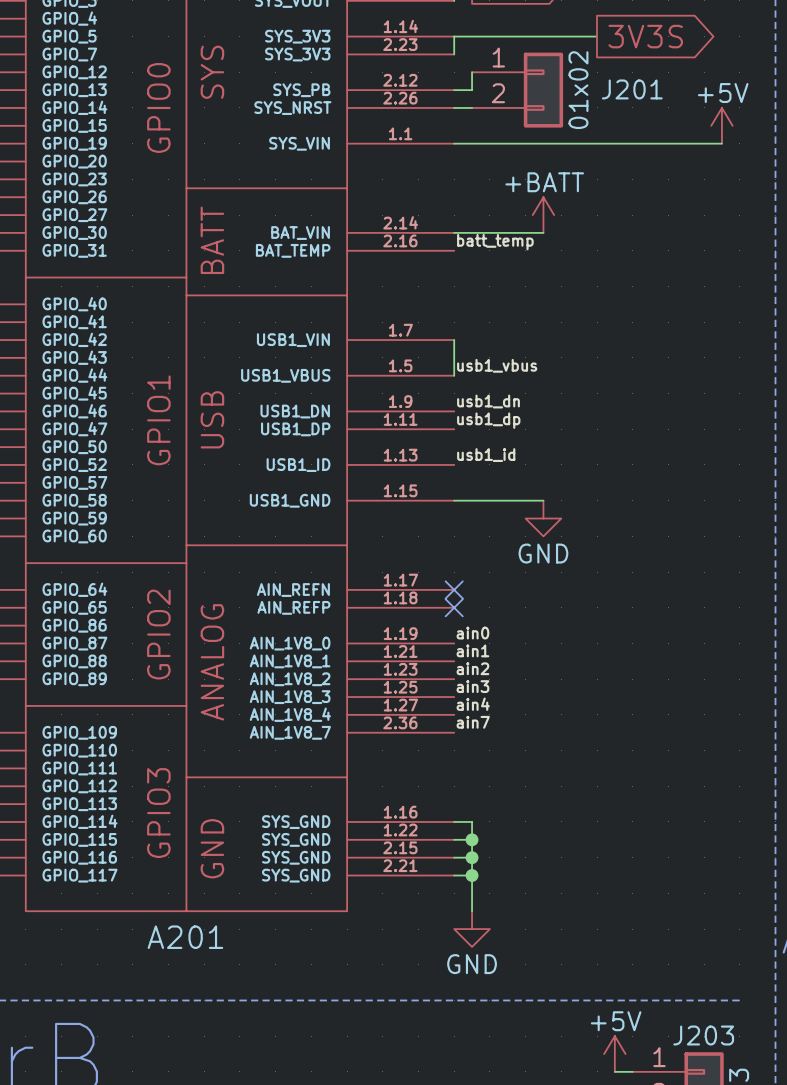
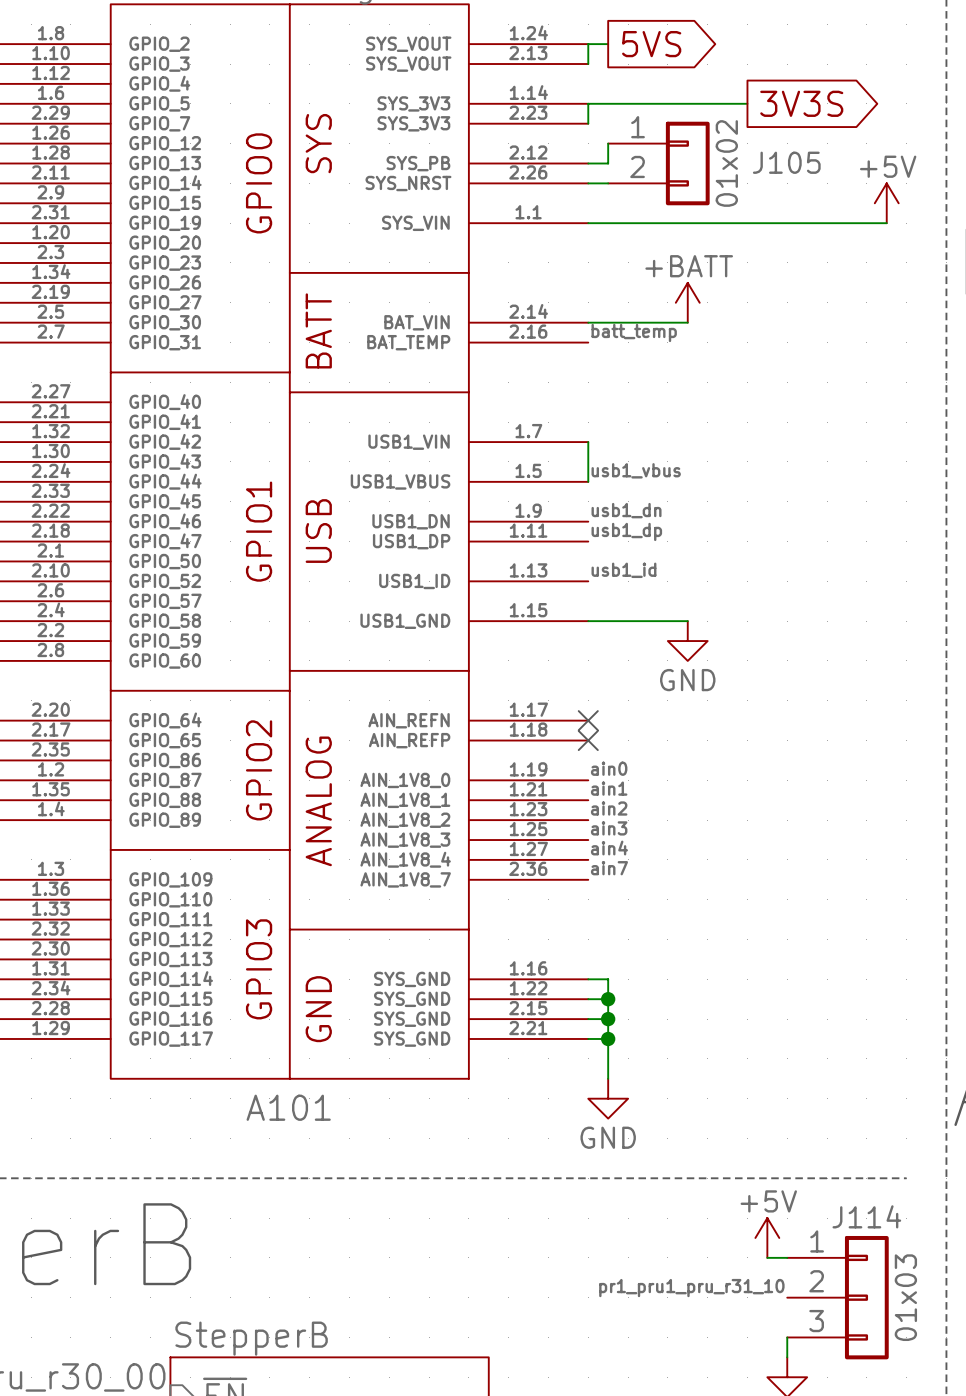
J201 name: J201 (632, 89) -> J105 (786, 162)
A201 name: A201 (185, 937) -> A101 (288, 1107)
J203 name: J203 (703, 1035) -> J114 (866, 1216)

